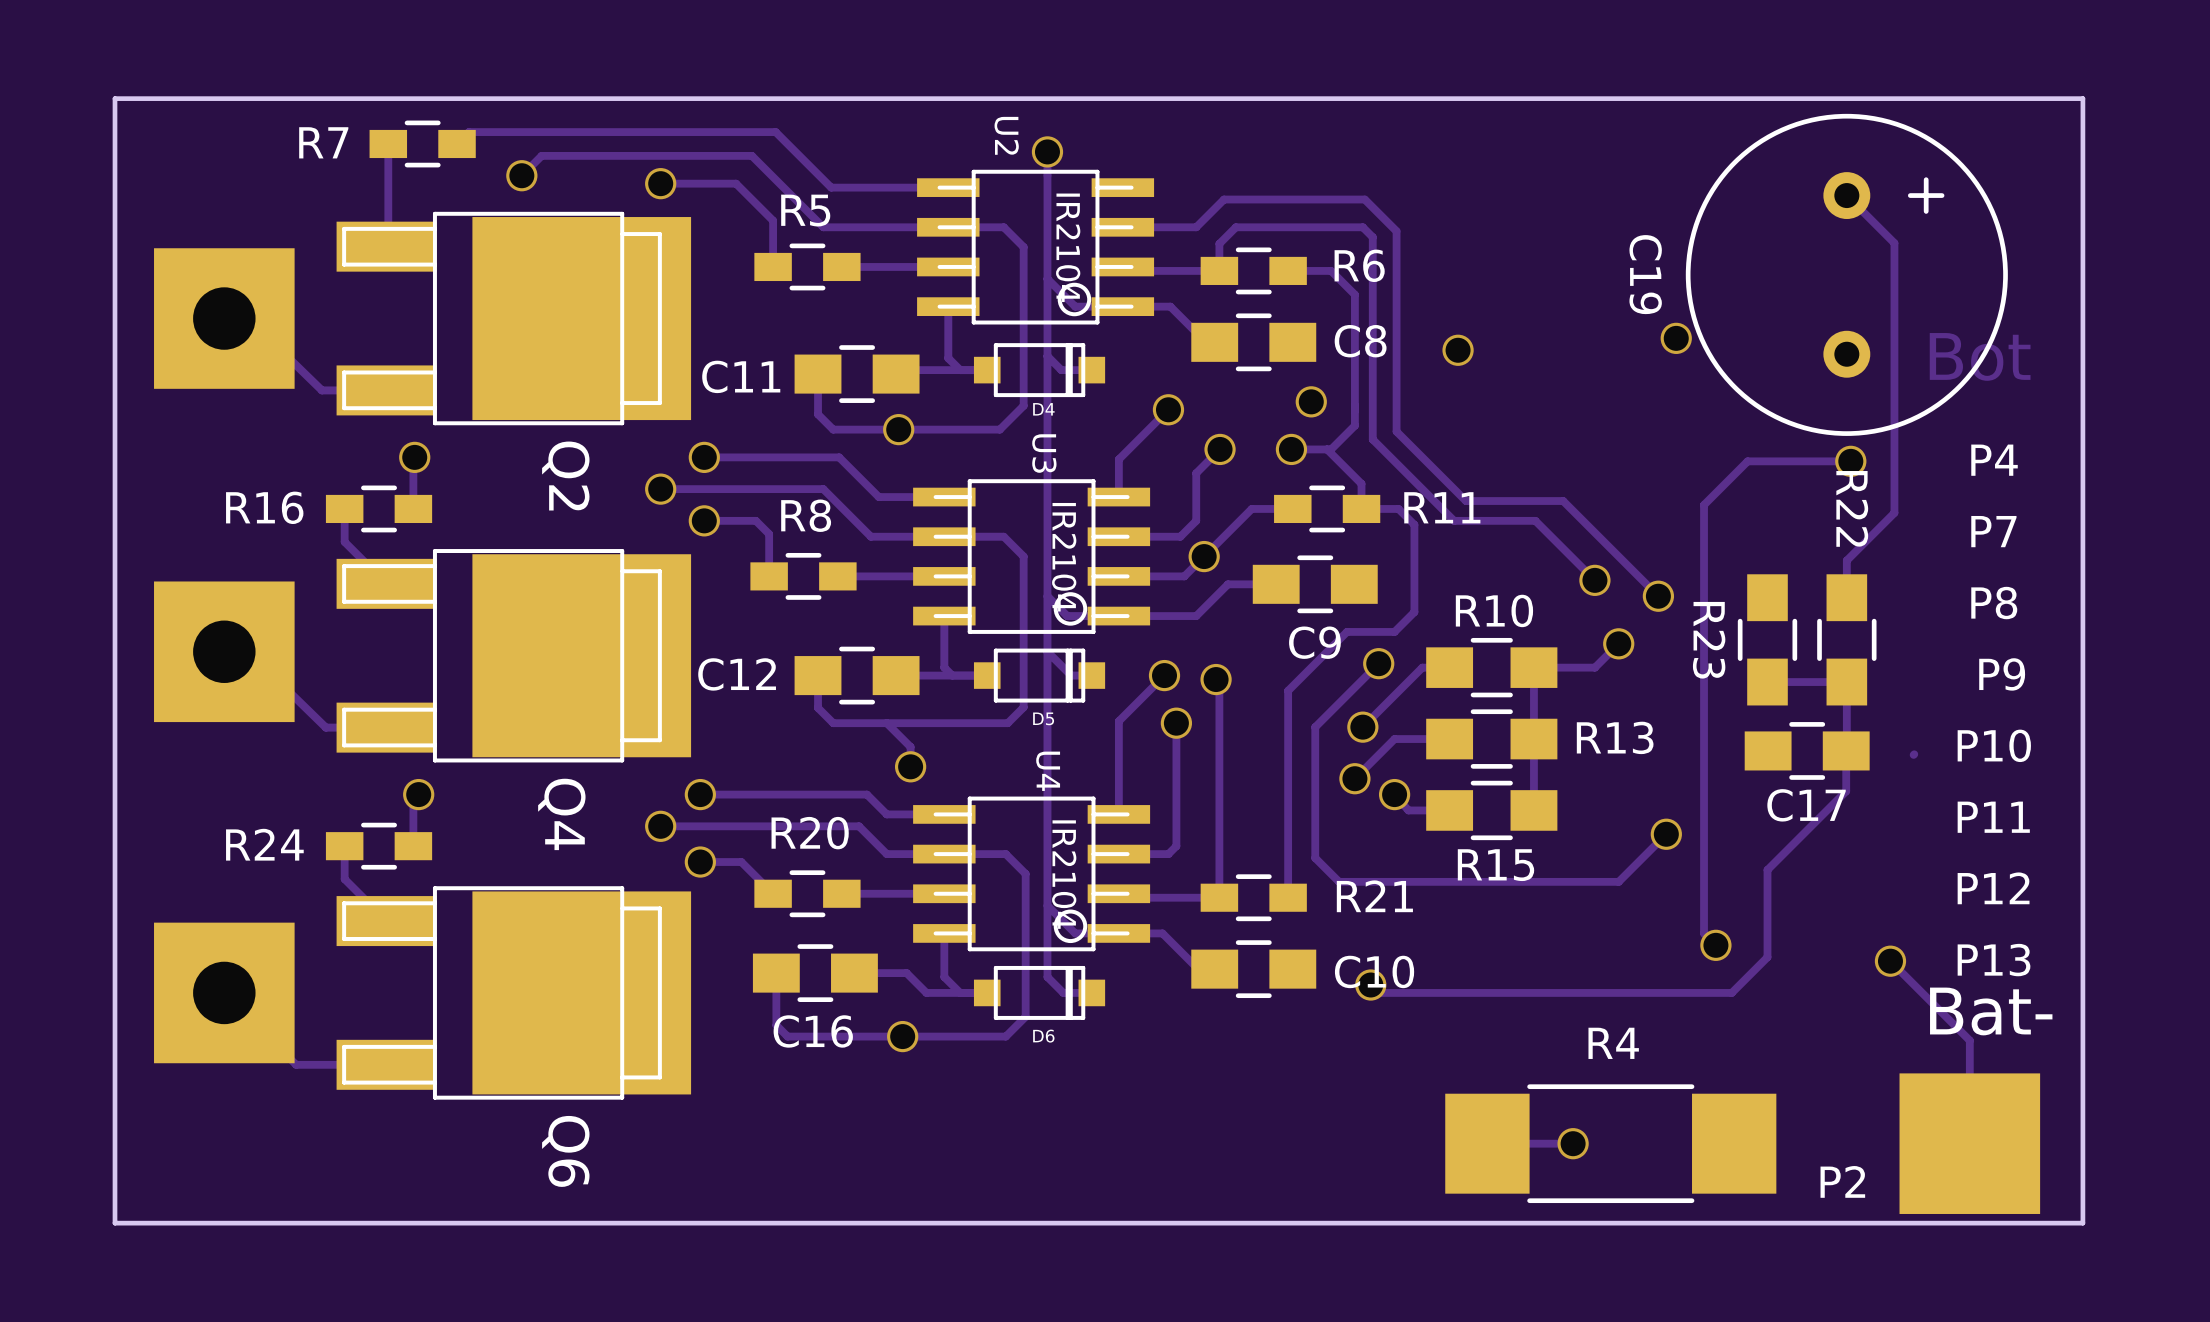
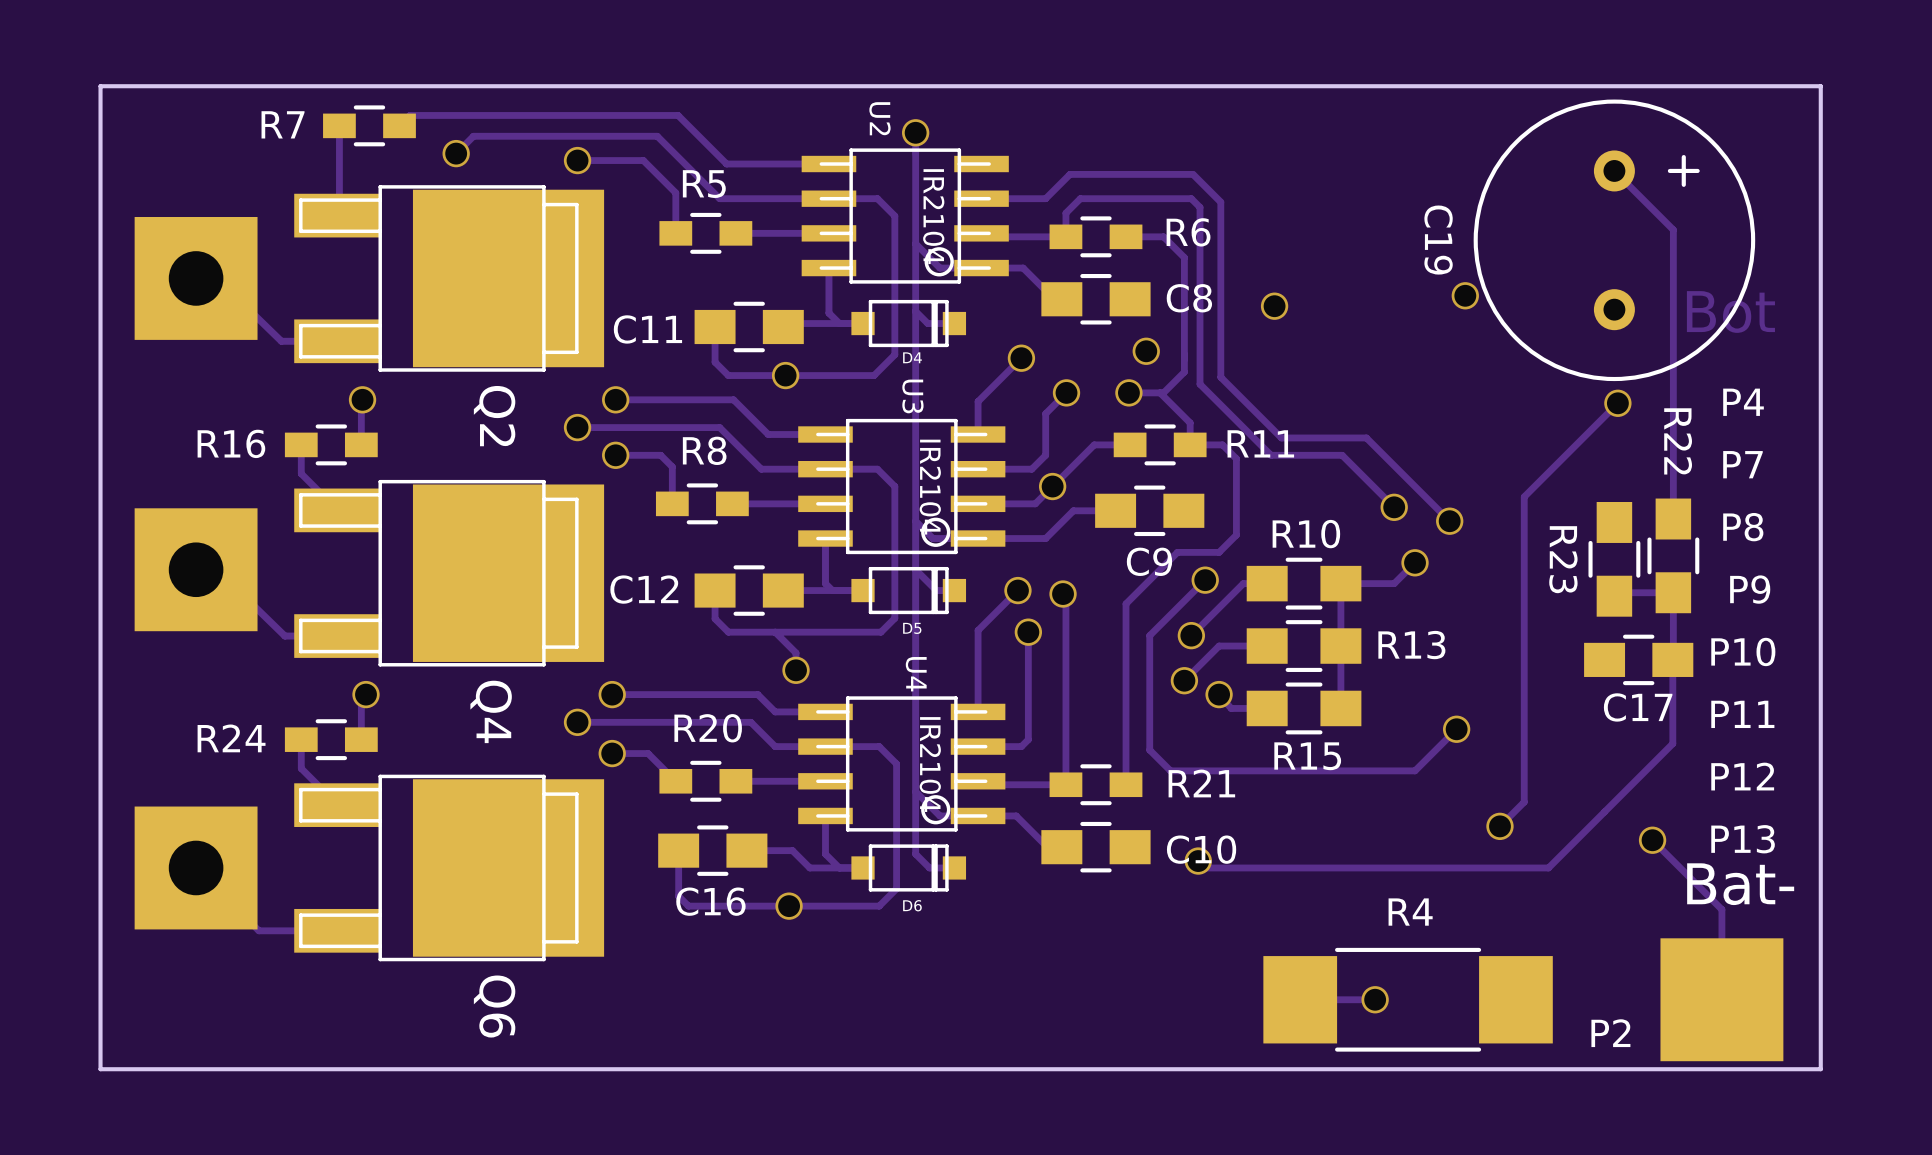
track: (1894, 243) (1894, 512) (1846, 560) (1846, 597) -> (1656, 212) (1673, 229) (1673, 519)
track: (1850, 461) (1747, 461) (1704, 504) (1704, 933) (1715, 945) -> (1617, 403) (1524, 496) (1524, 802) (1499, 826)
R22 name: R22 (1852, 508) -> R23 (1563, 559)
R22: none -> (1673, 555)
R23: (1767, 639) -> none
track: none -> (1610, 592) (1673, 592) (1673, 659)
track: (1767, 682) (1846, 682) (1846, 791) (1767, 869) (1767, 957) (1731, 992) -> (1672, 659) (1672, 743) (1548, 867) (1513, 867)
C17 position: (1807, 750) -> (1638, 659)

